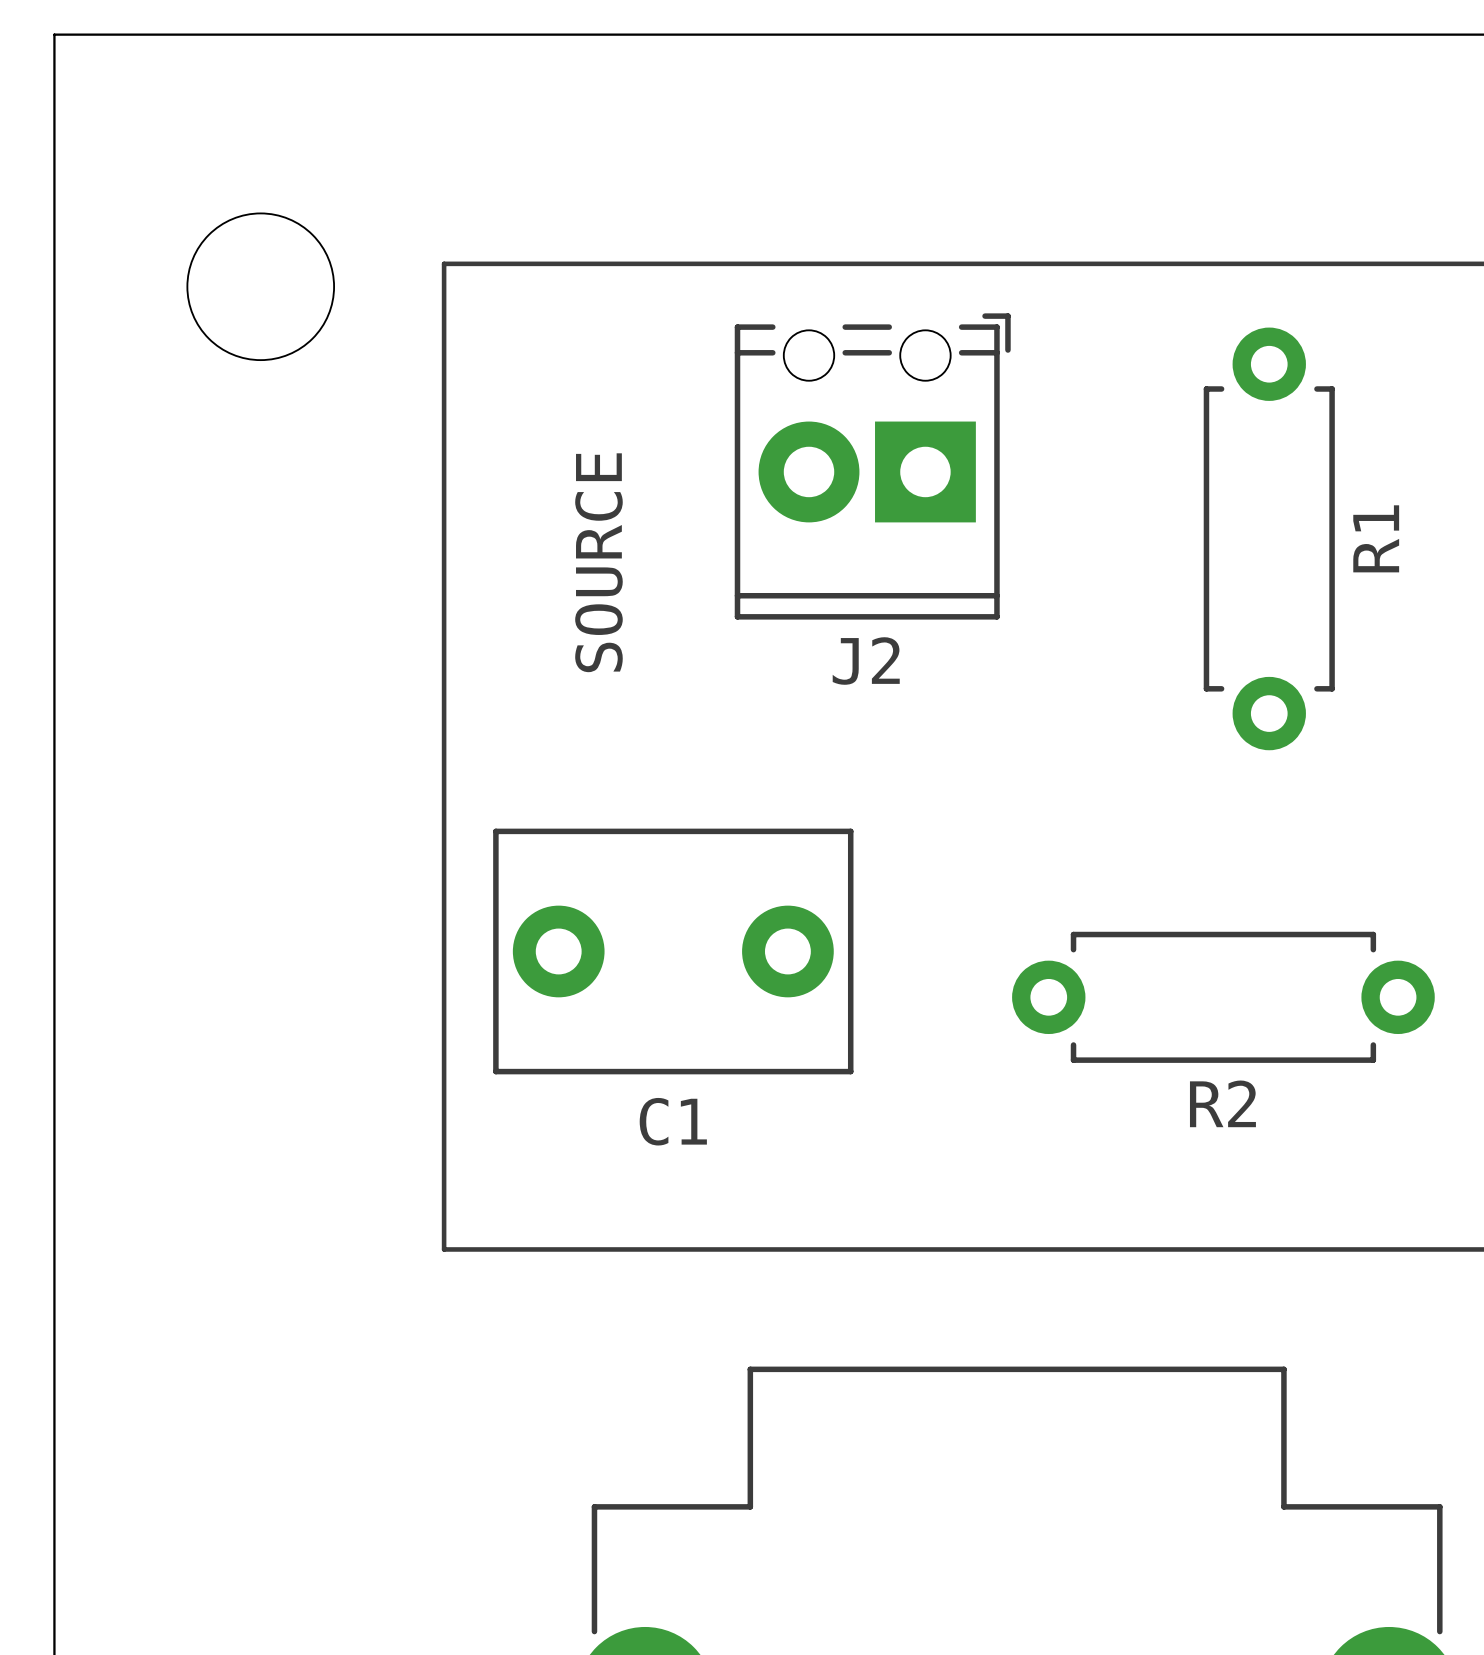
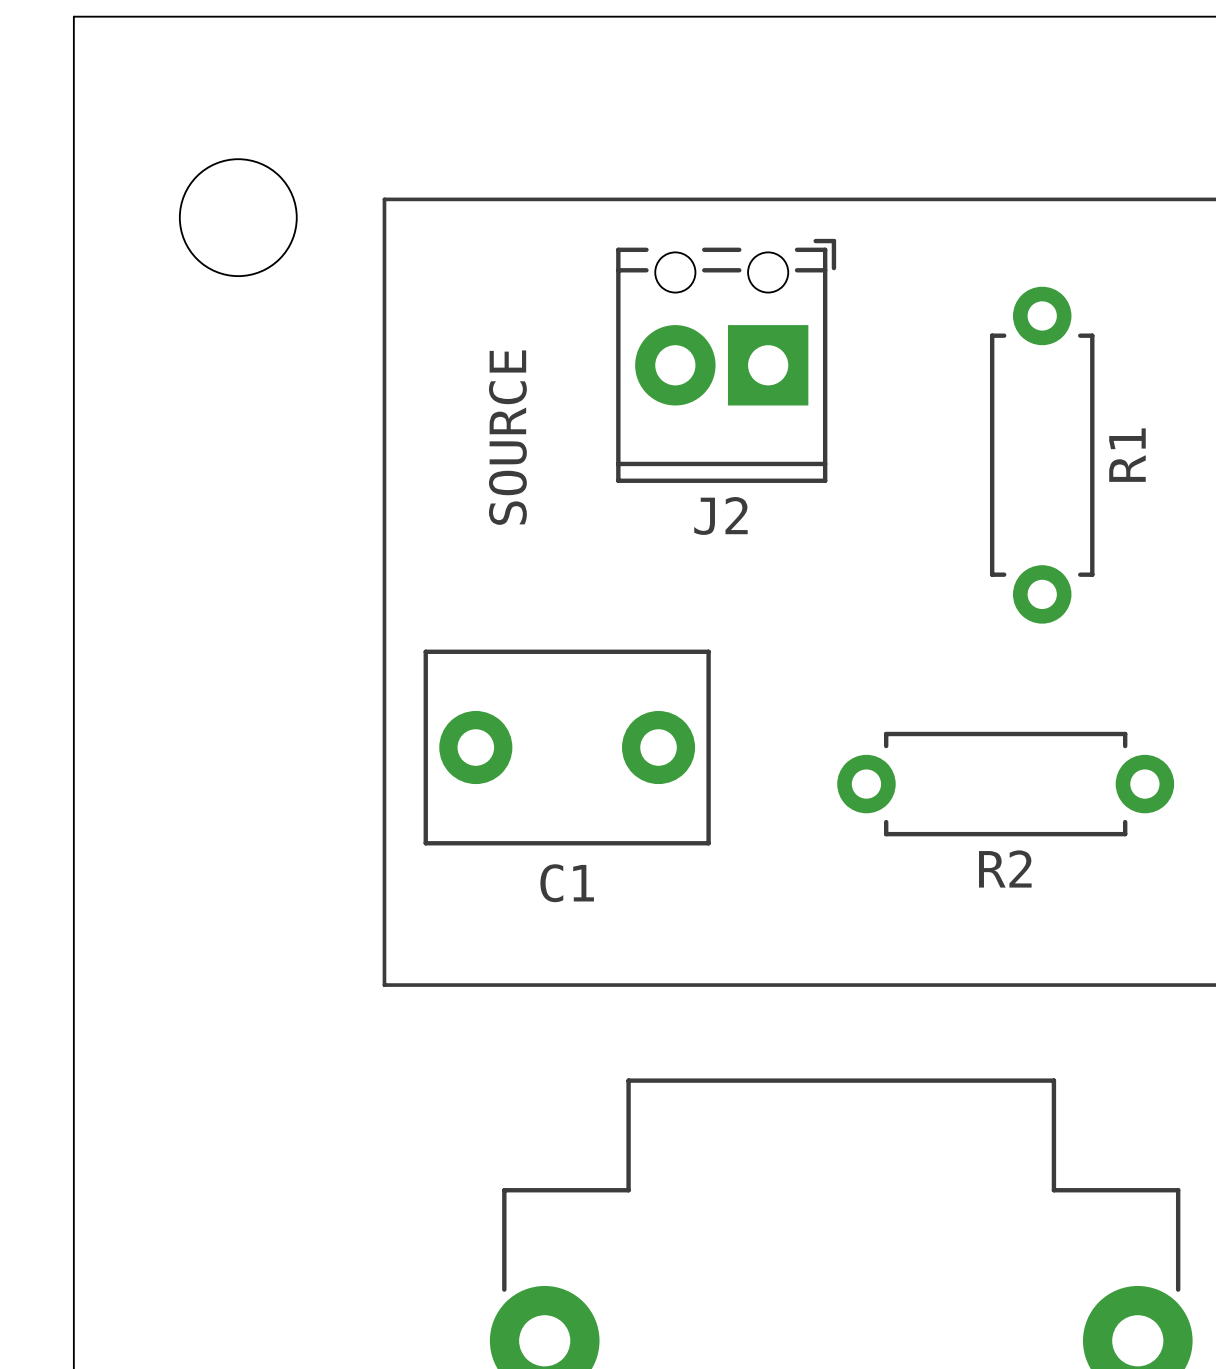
R1 position: (1269, 538) -> (1042, 455)

